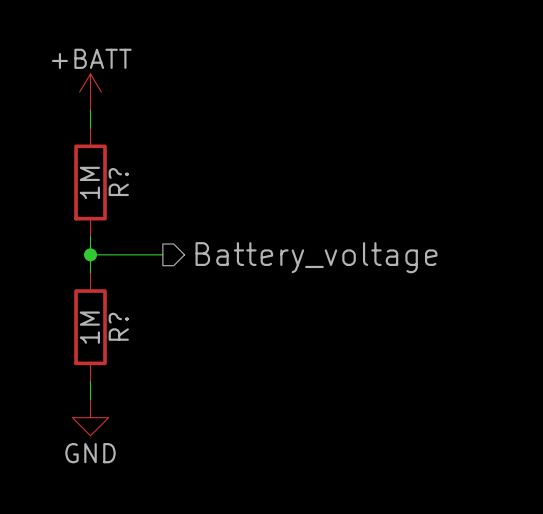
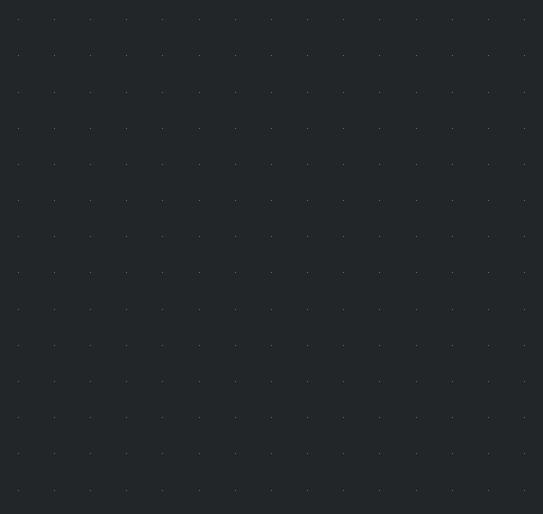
power symbol: +BATT (90, 92) -> none
wire: (90, 110) (90, 128) -> none
R?: 1M (90, 182) -> none
wire: (90, 236) (90, 272) -> none
wire: (90, 254) (162, 254) -> none
junction: (90, 254) -> none
hierarchical label: Battery_voltage (316, 257) -> none
R?: 1M (90, 327) -> none
wire: (90, 381) (90, 399) -> none
power symbol: GND (90, 417) -> none

